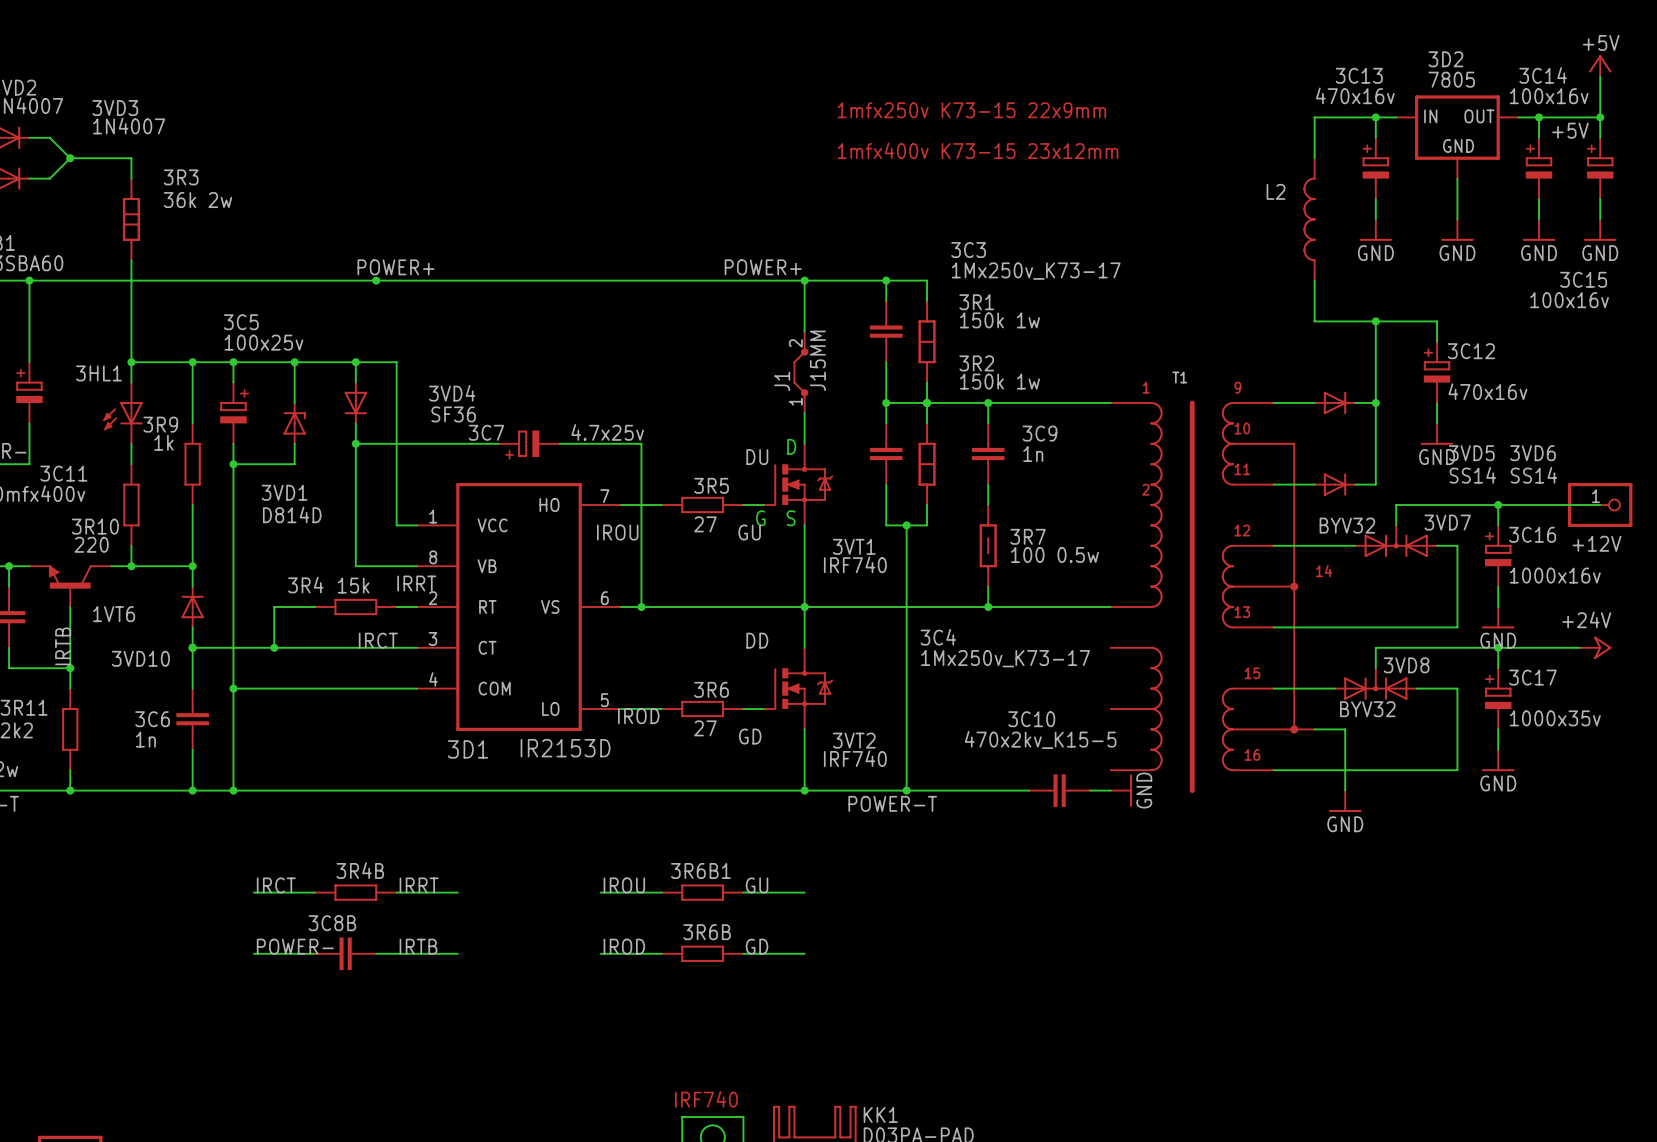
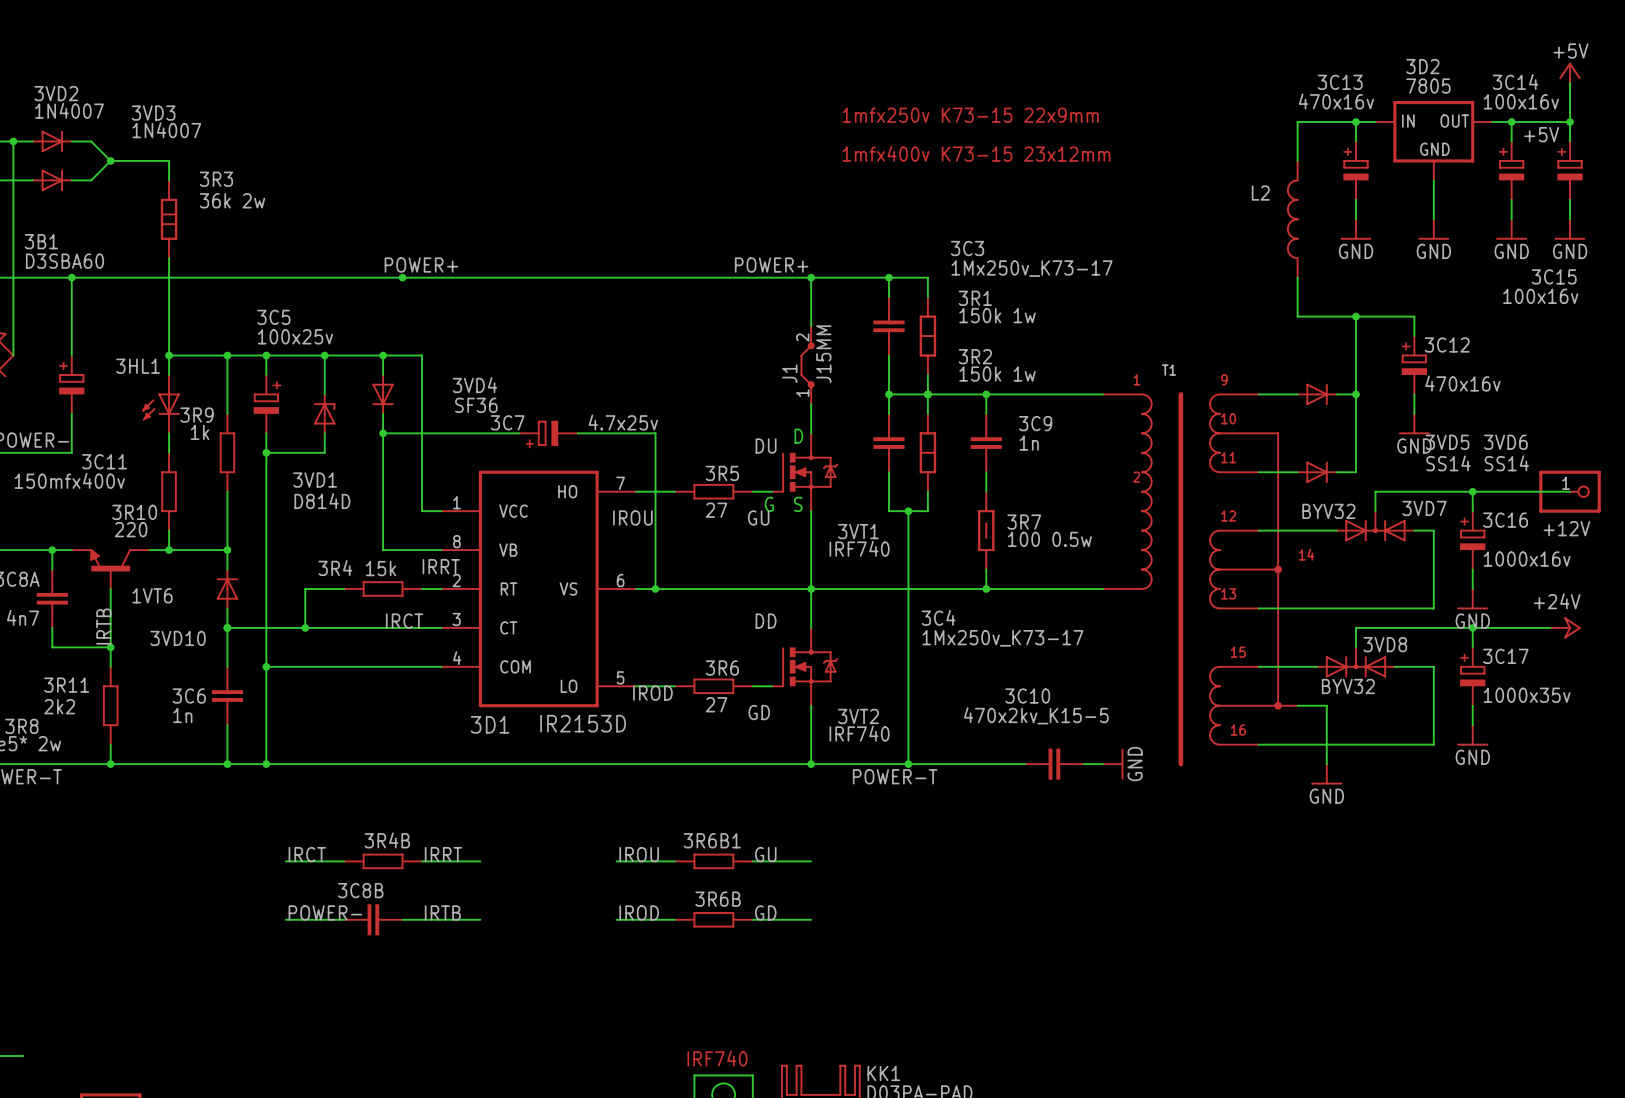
T1 symbol: [1110, 400, 1315, 794] -> [1103, 392, 1298, 767]

